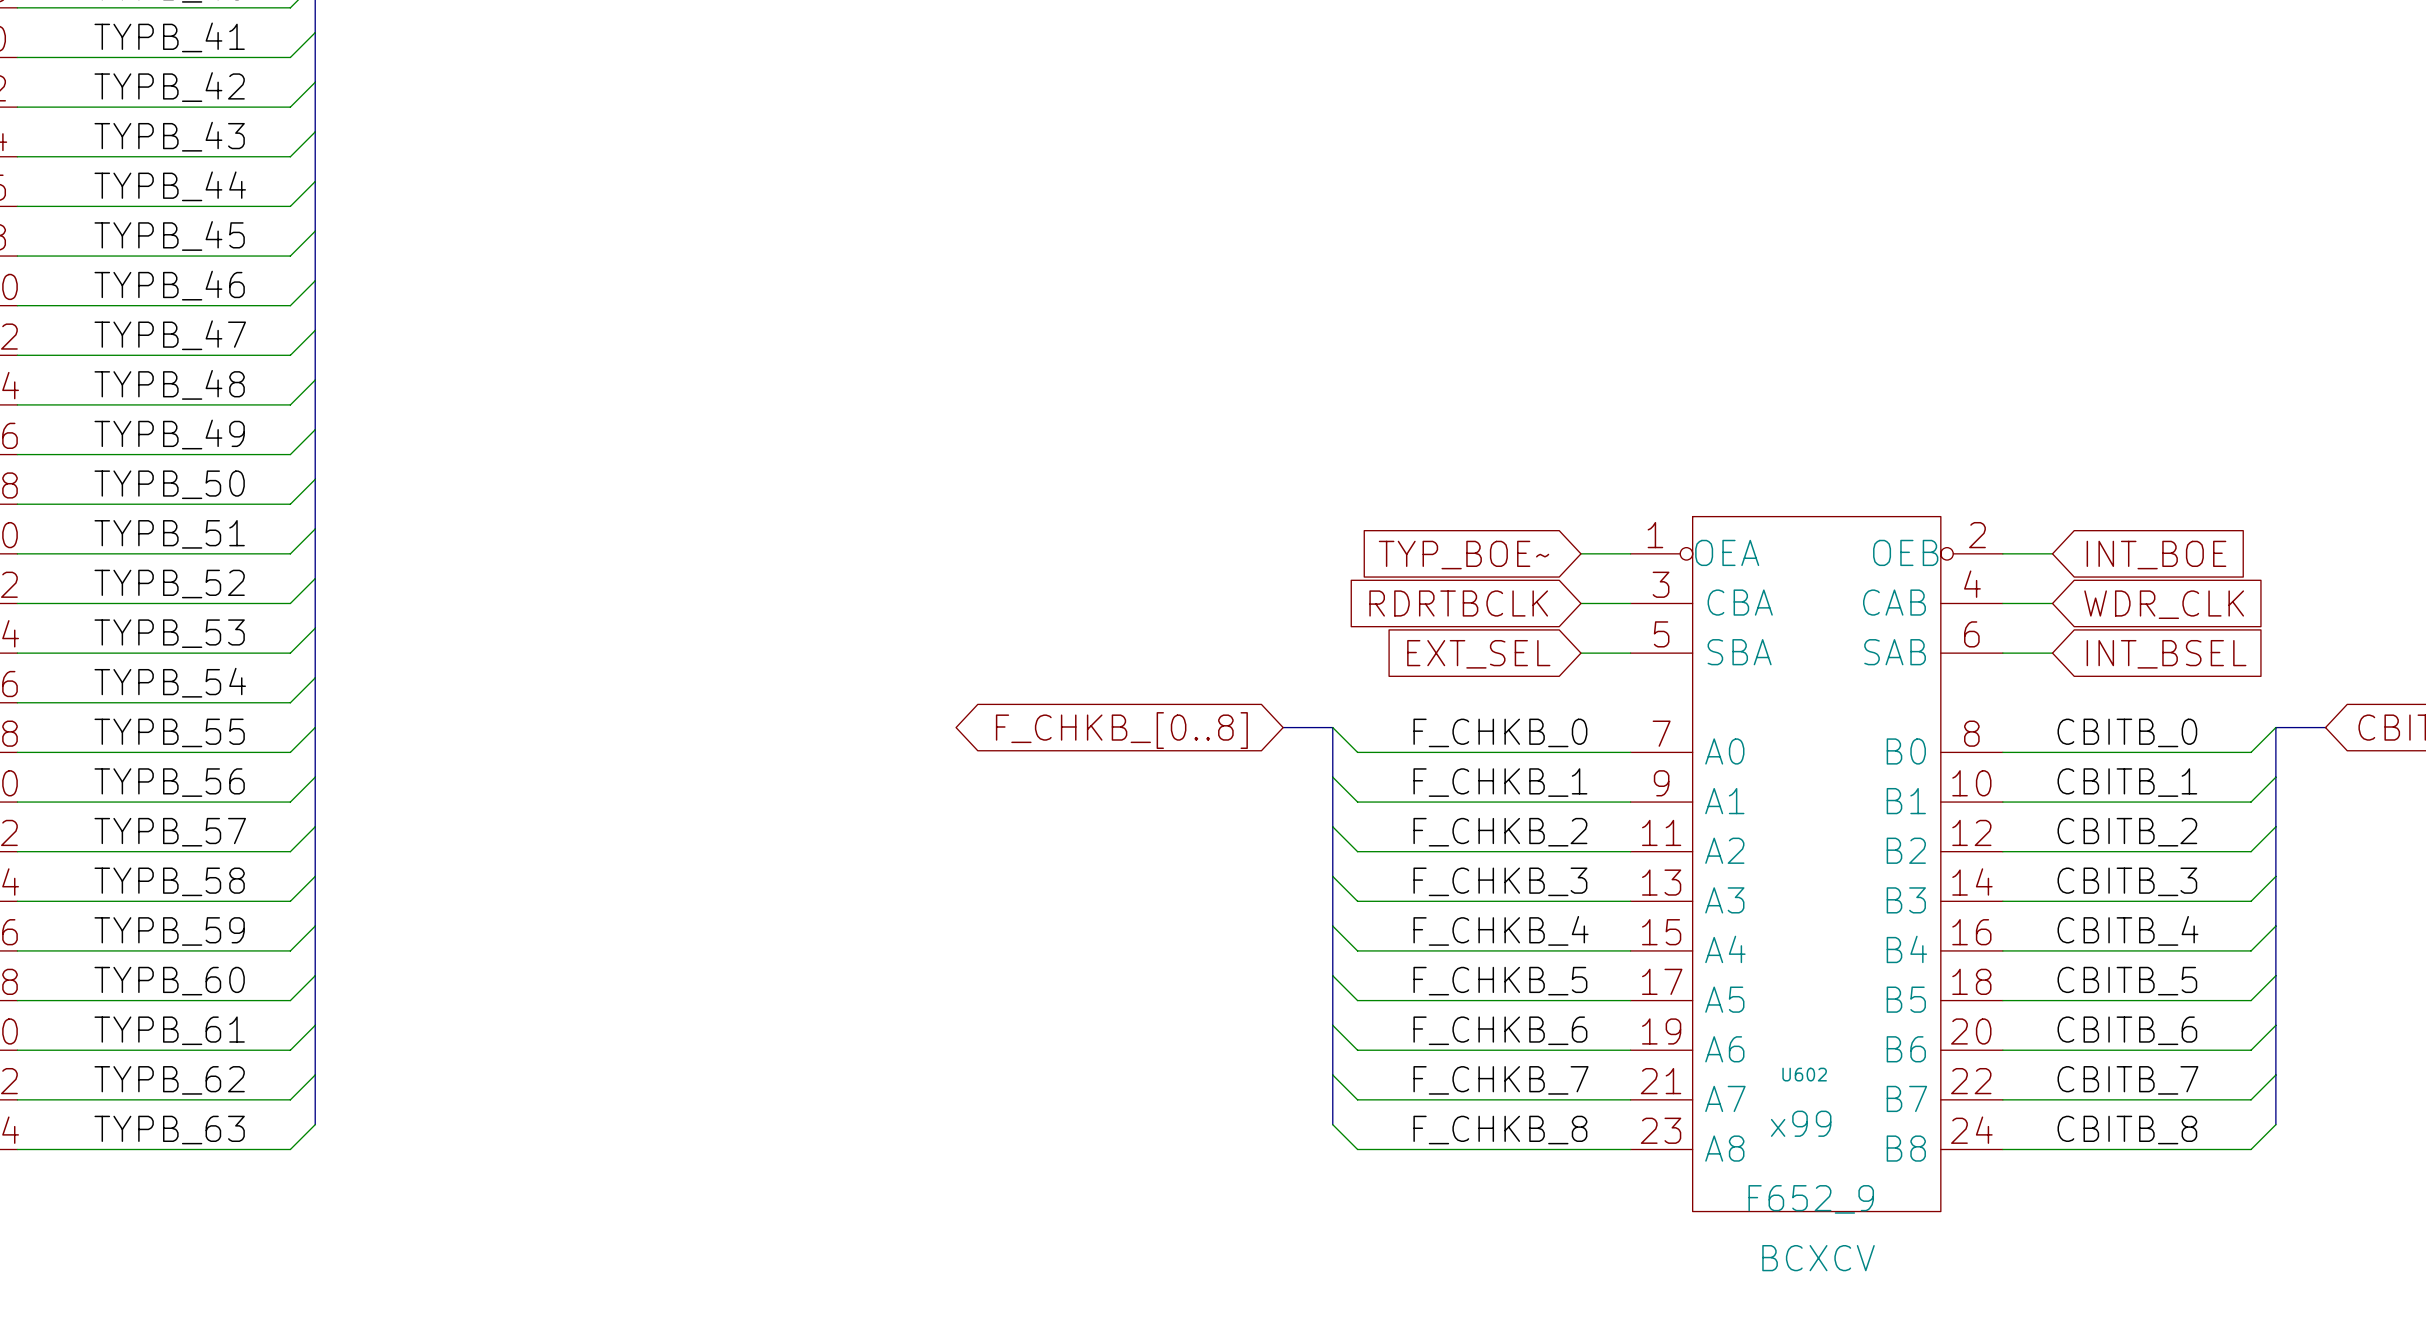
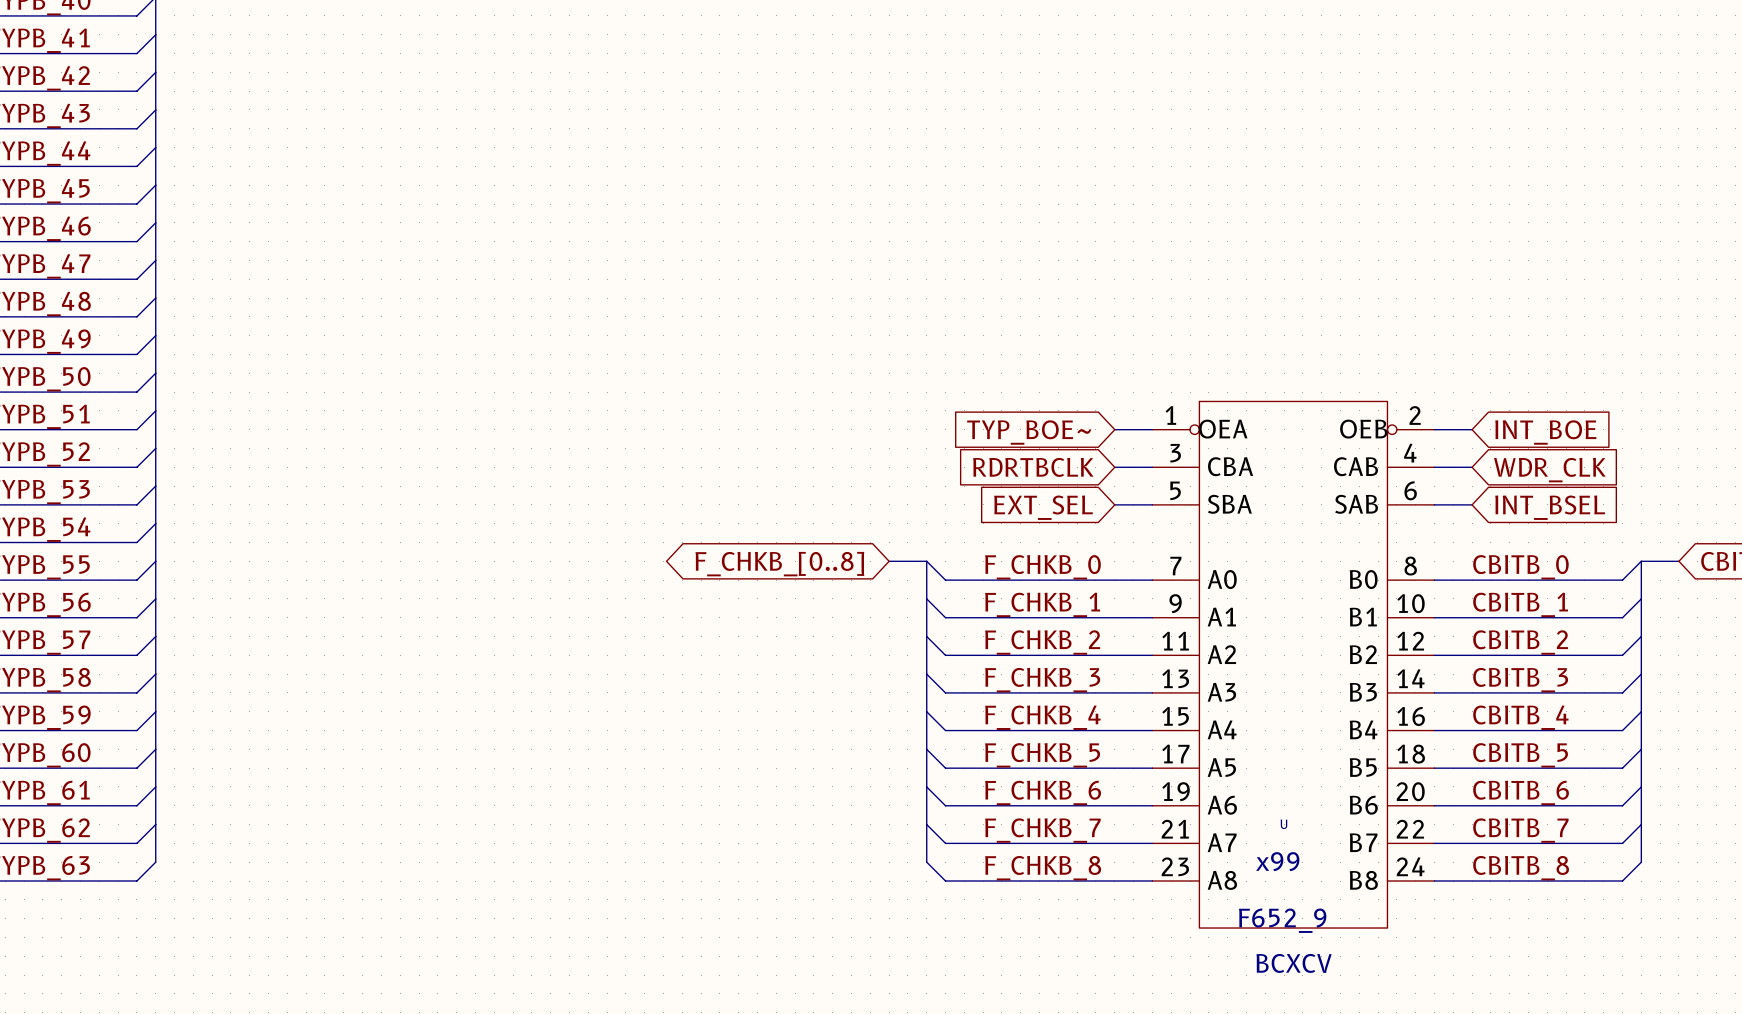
U602 name: U602 (1804, 1074) -> U (1283, 824)

